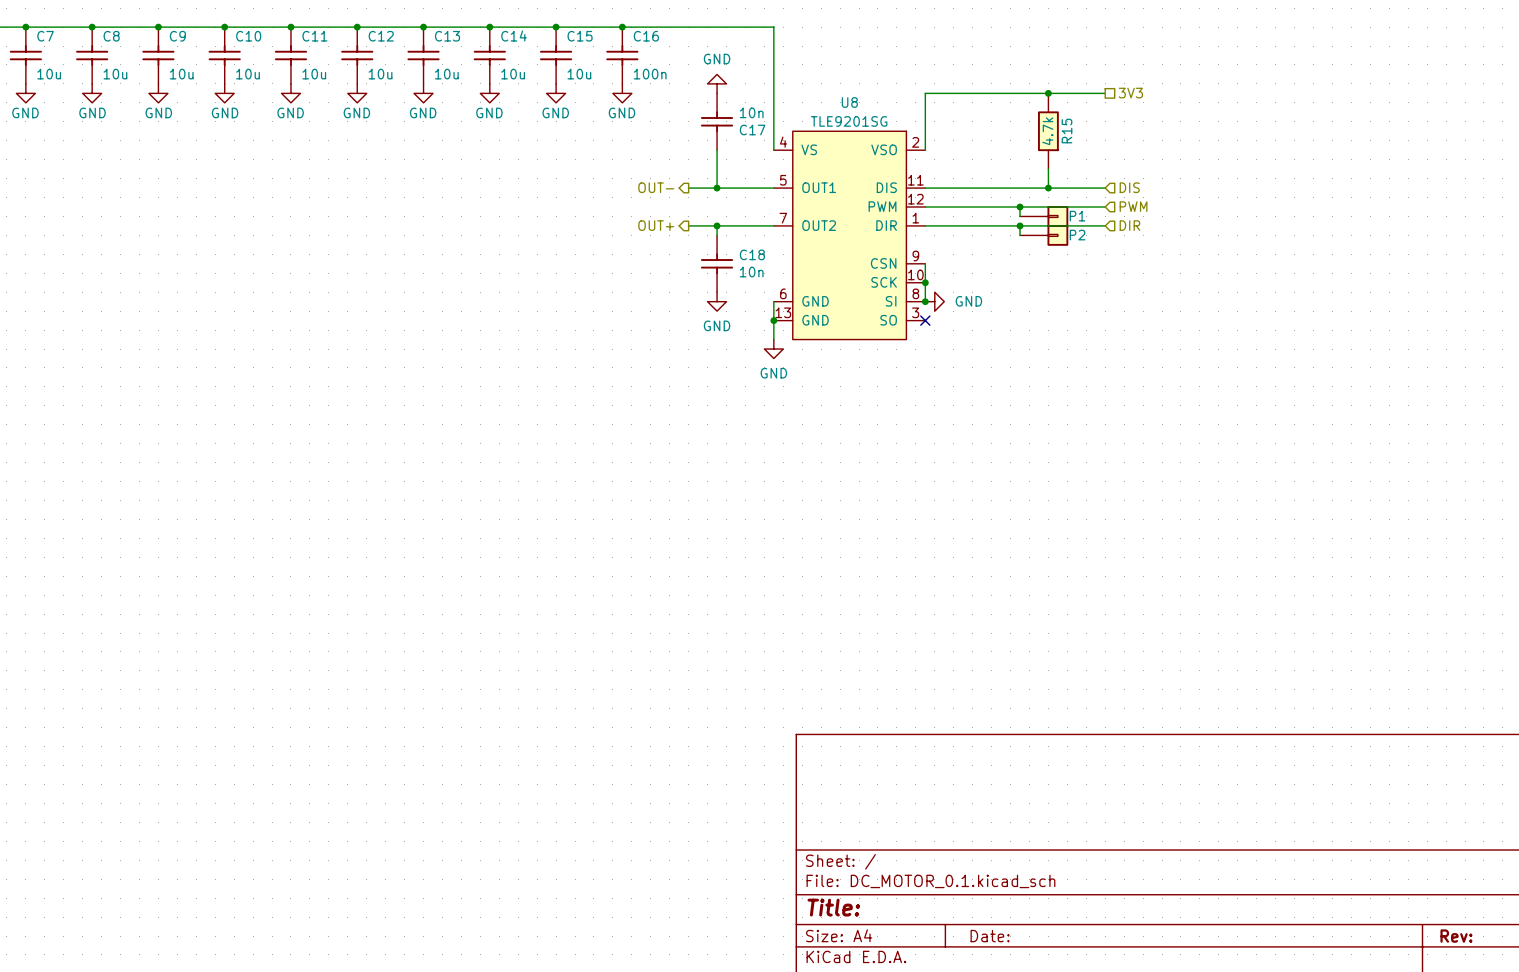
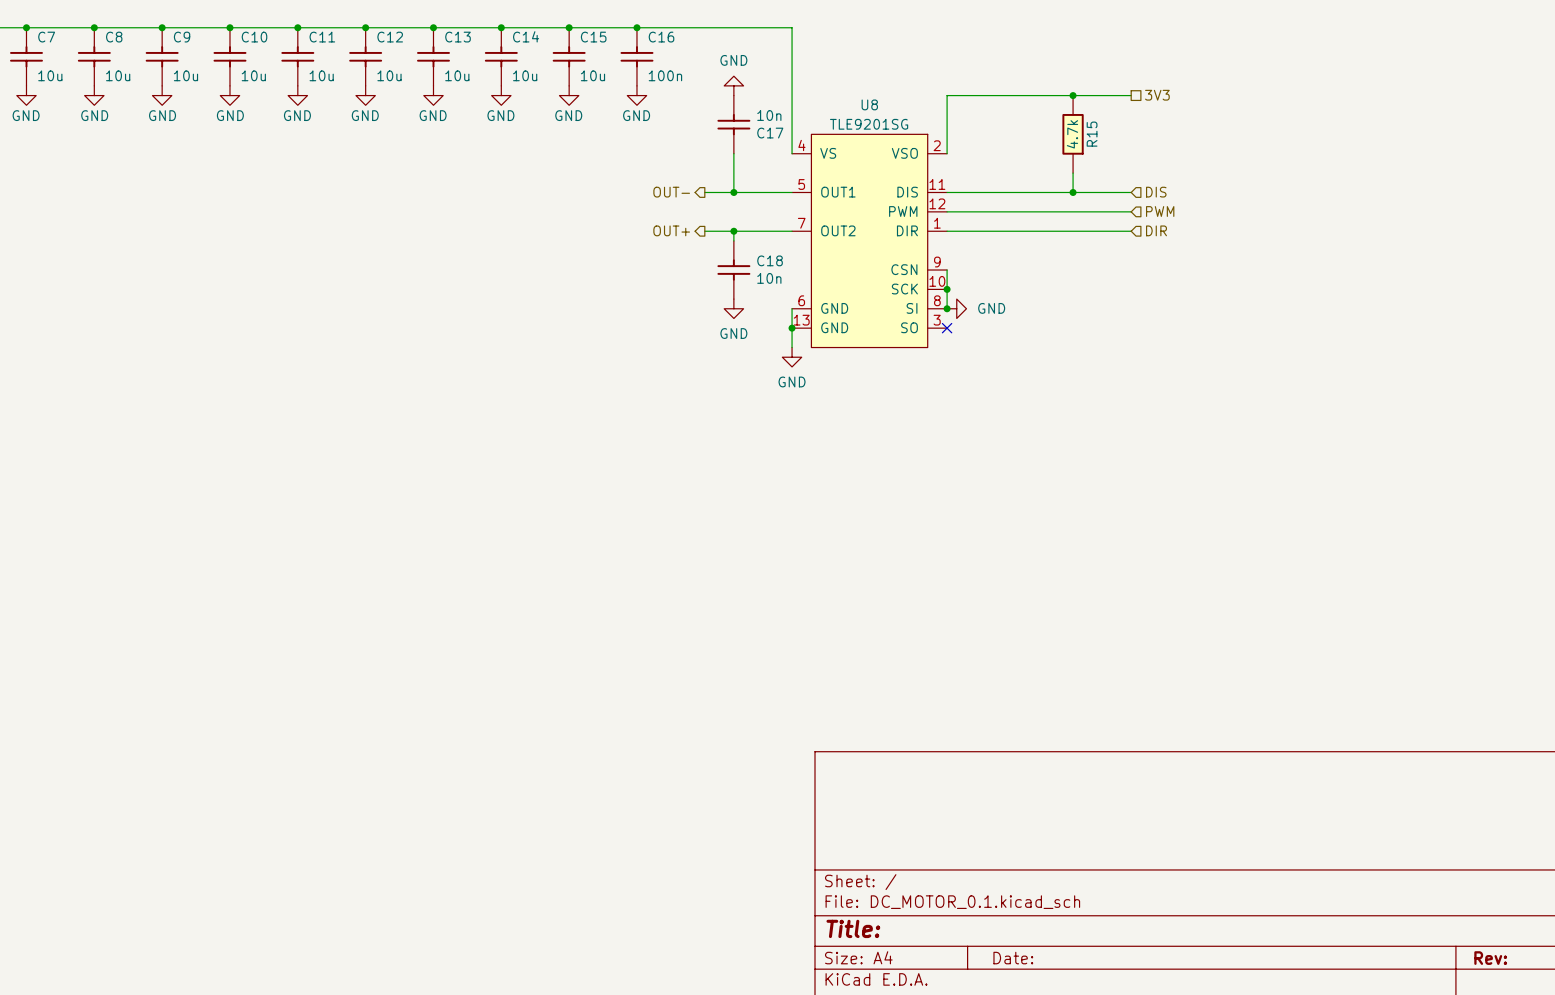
wire: (1020, 207) (1020, 216) -> none
junction: (1020, 207) -> none
P1: (1044, 216) -> none
wire: (1020, 225) (1020, 235) -> none
junction: (1020, 225) -> none
P2: (1044, 235) -> none

